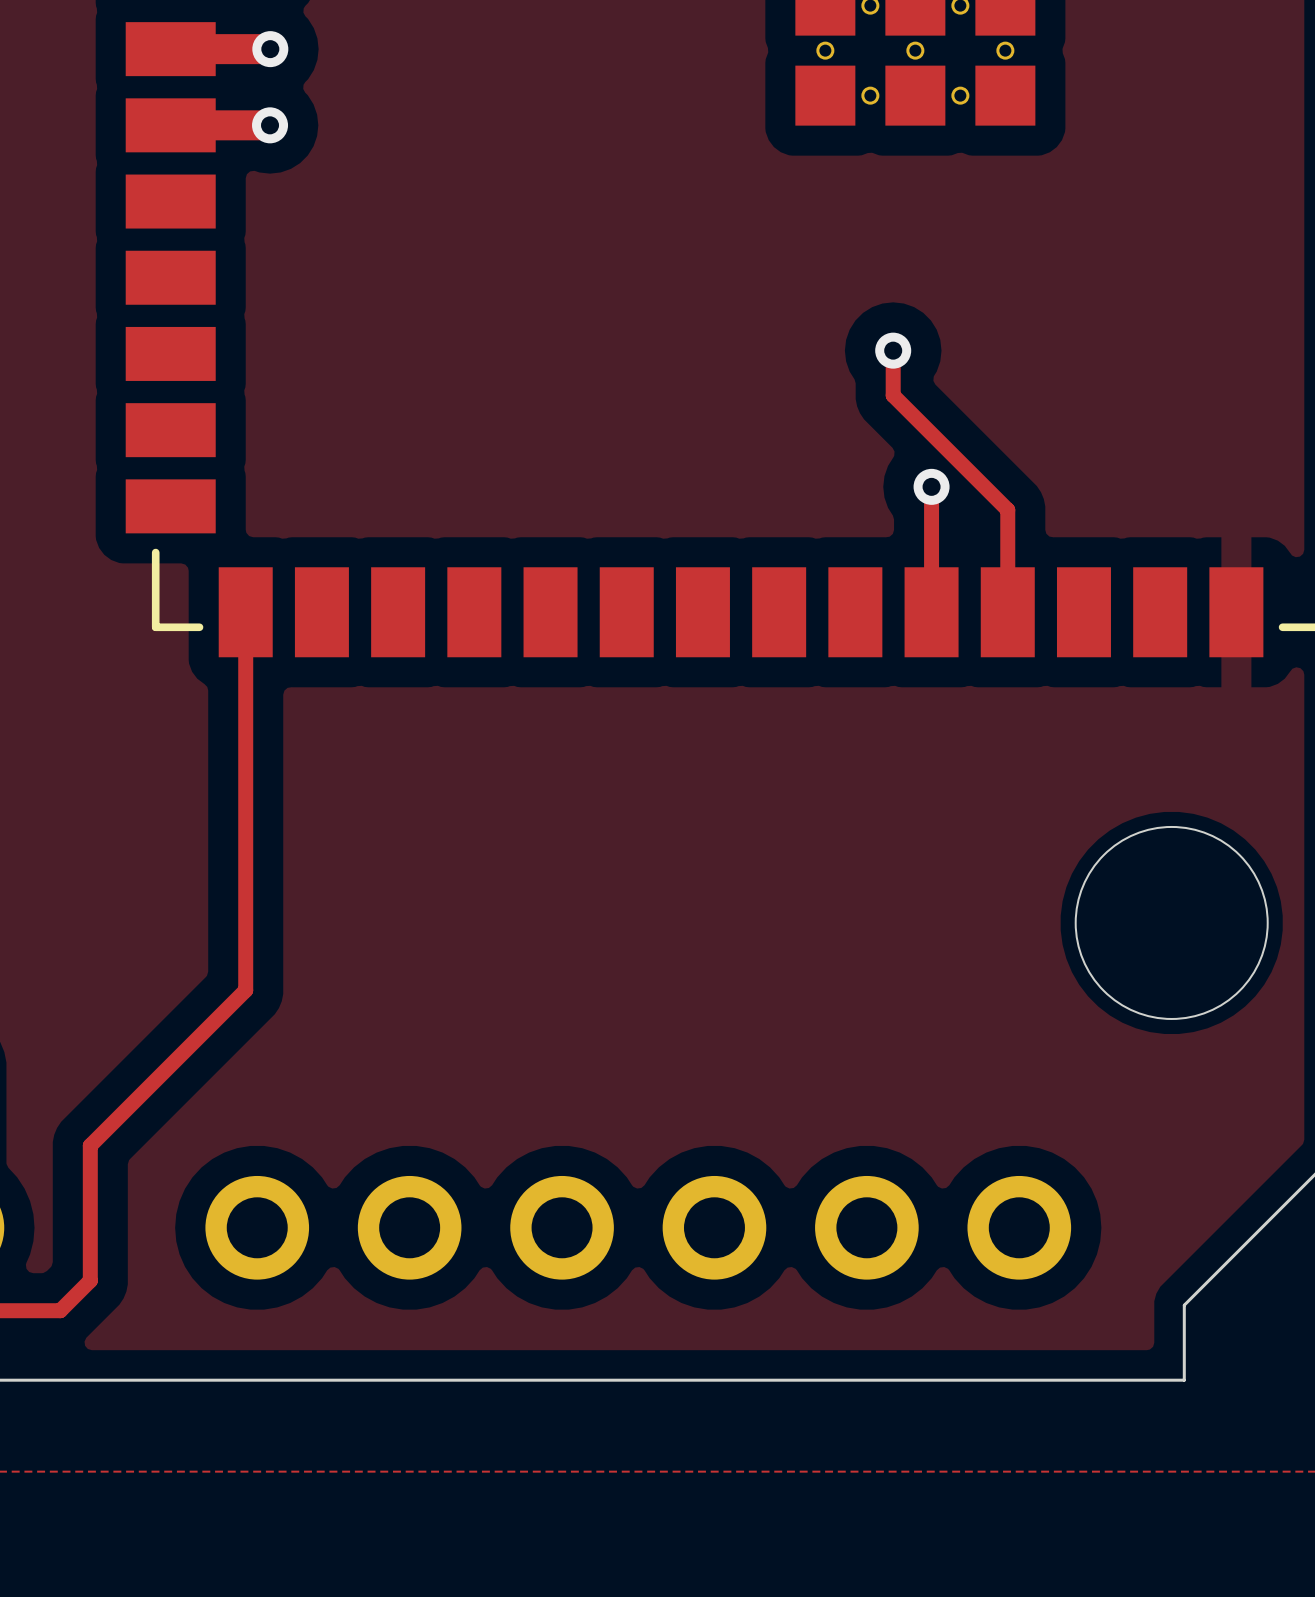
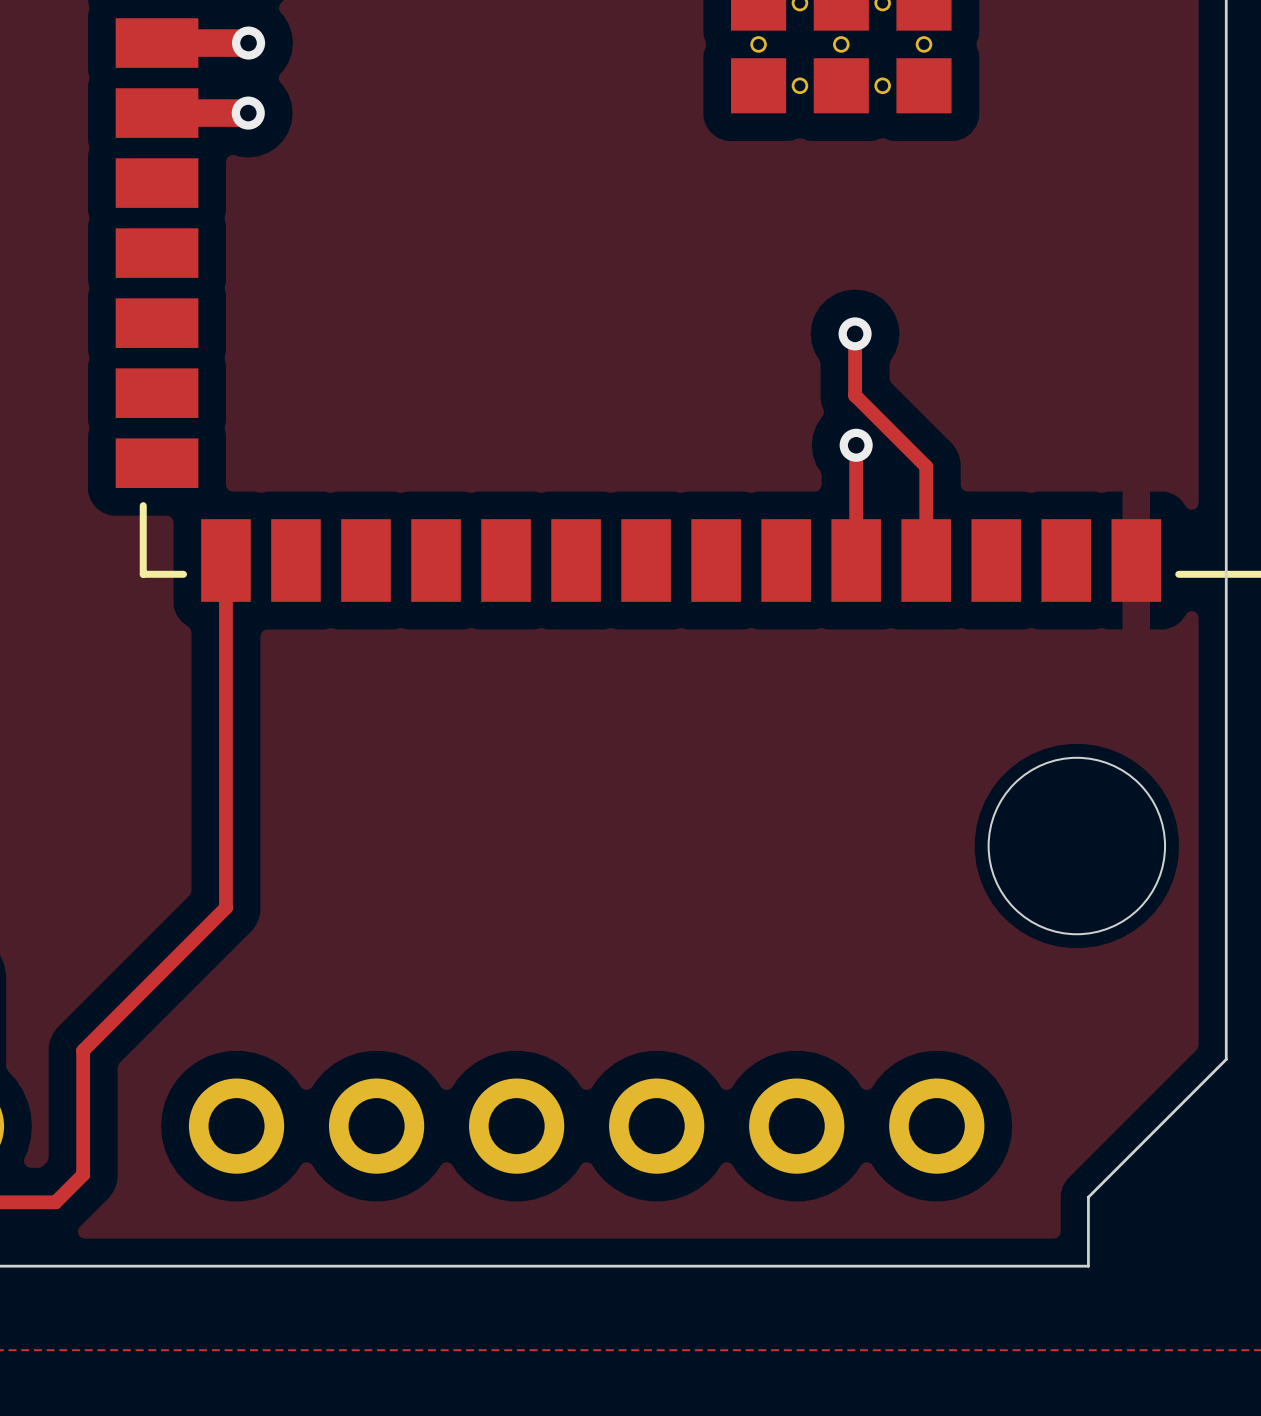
track: (893, 350) (893, 395) (930, 432) -> (855, 333) (855, 395)
via position: (893, 350) -> (855, 333)

